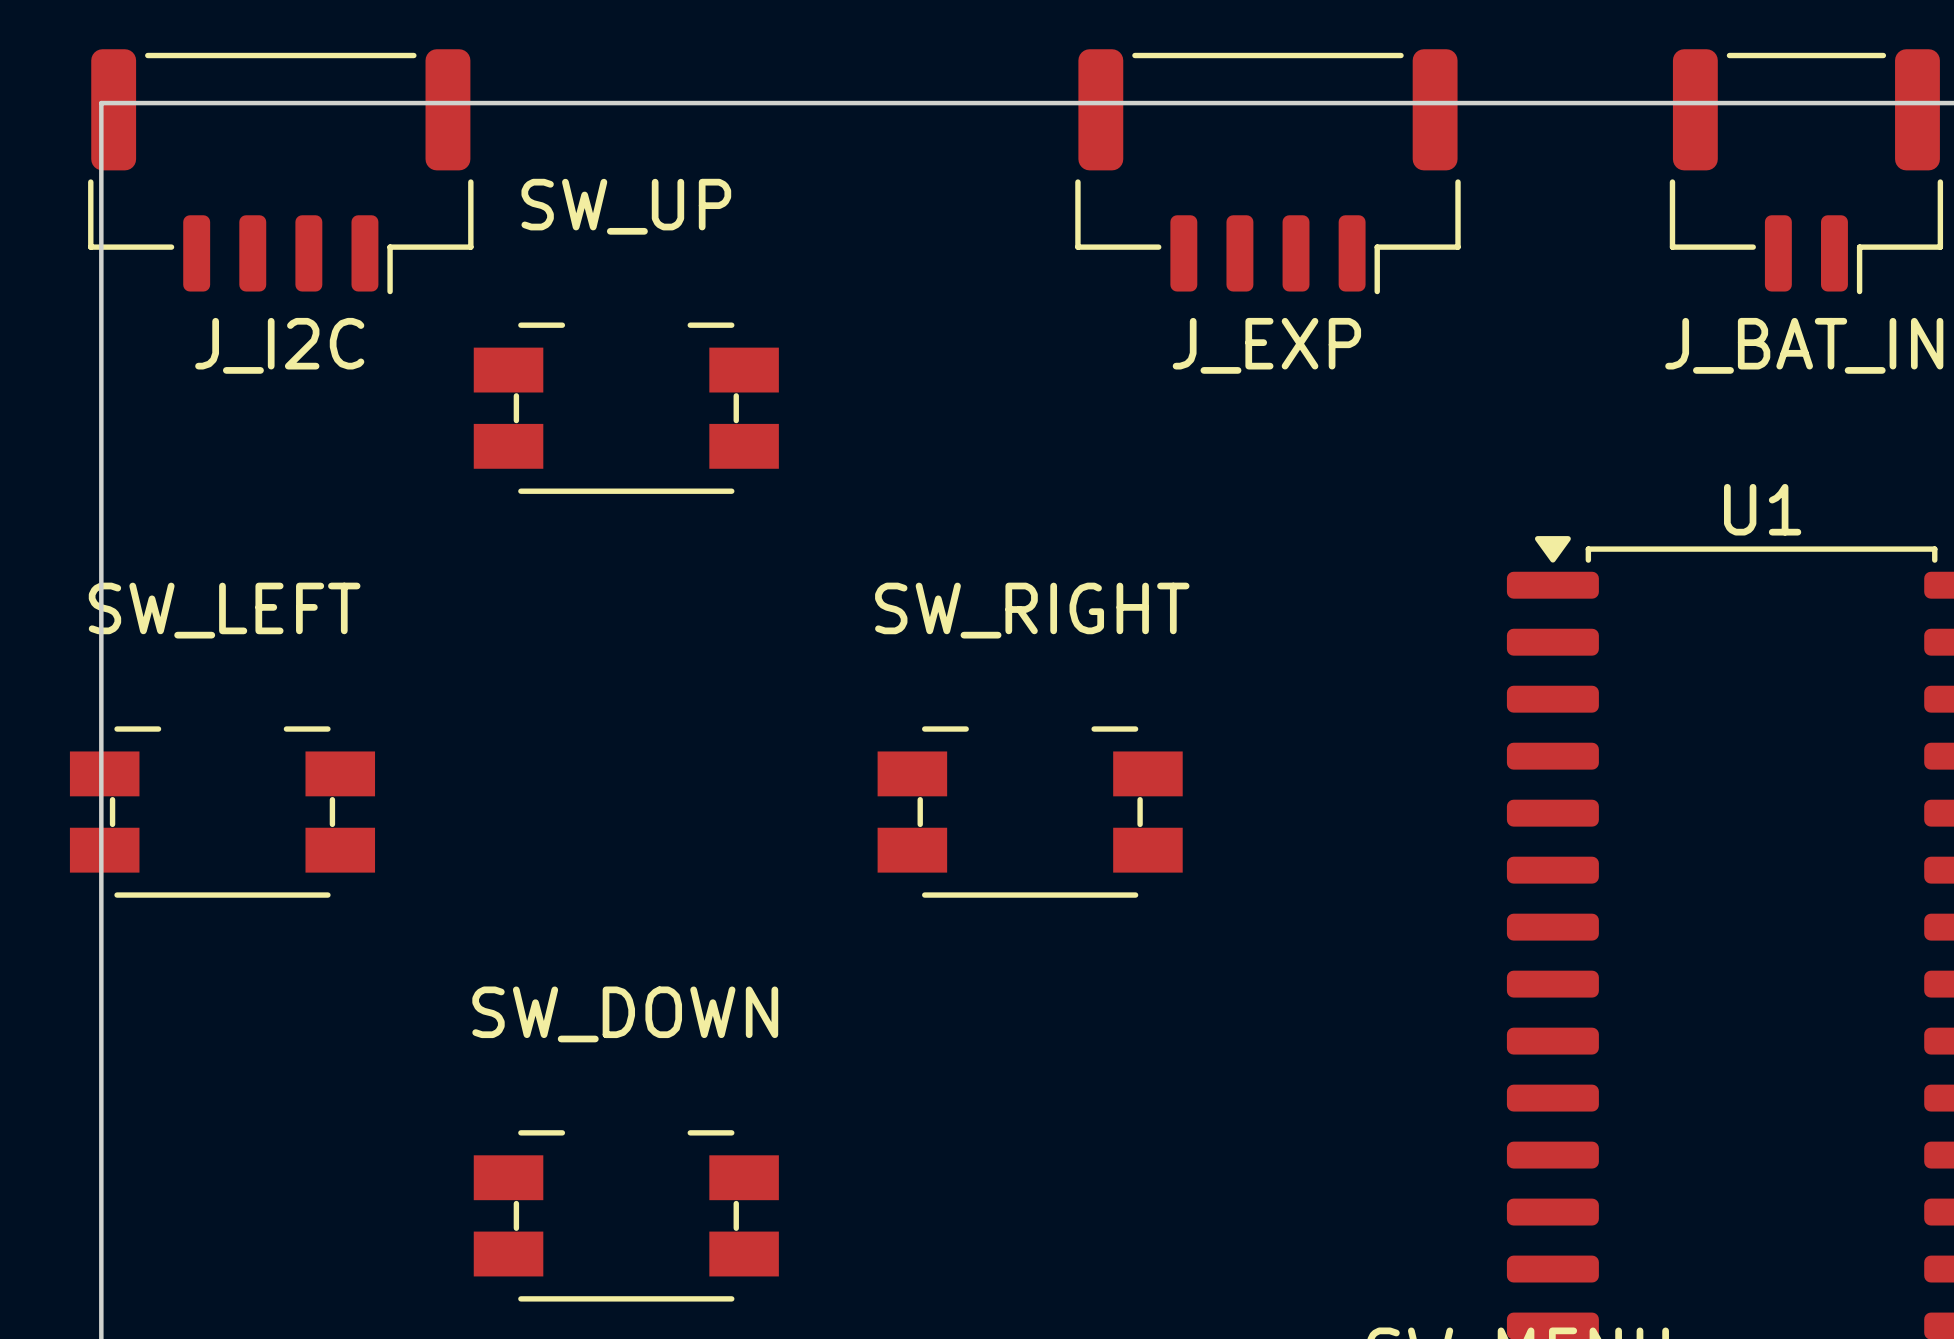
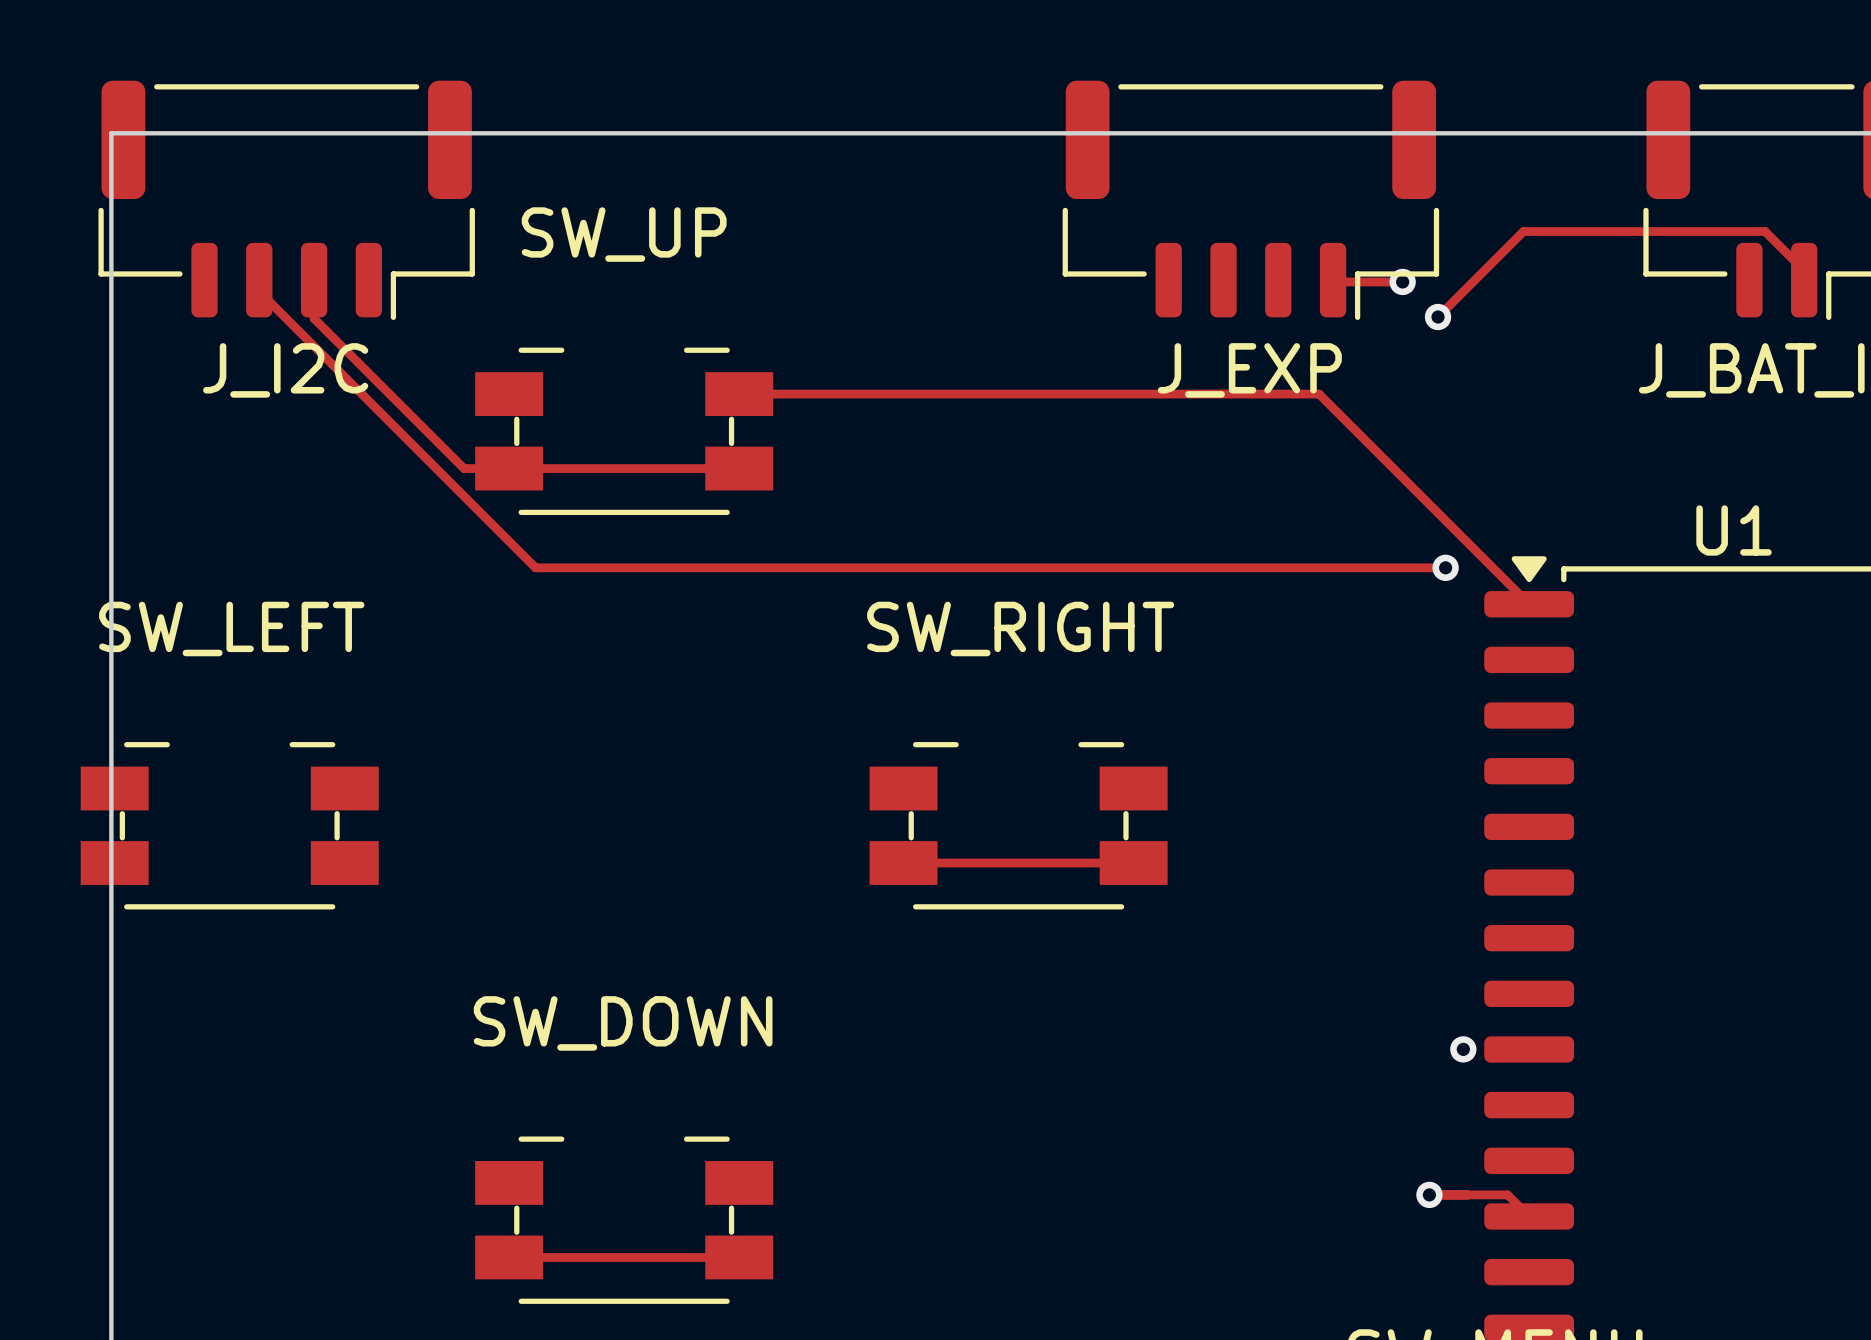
track: none -> (259, 280) (259, 291) (535, 567) (1445, 567)
track: none -> (314, 280) (314, 318) (464, 468) (739, 468)
track: none -> (1333, 280) (1334, 281) (1402, 281)
track: none -> (1804, 280) (1804, 270) (1765, 231) (1523, 231) (1438, 317)
via: none -> (1402, 281)
via: none -> (1438, 317)
track: none -> (739, 394) (1319, 394) (1529, 604)
via: none -> (1445, 567)
track: none -> (903, 863) (1133, 863)
via: none -> (1463, 1049)
track: none -> (1429, 1194) (1507, 1194) (1529, 1216)
via: none -> (1429, 1194)
track: none -> (509, 1257) (739, 1257)

